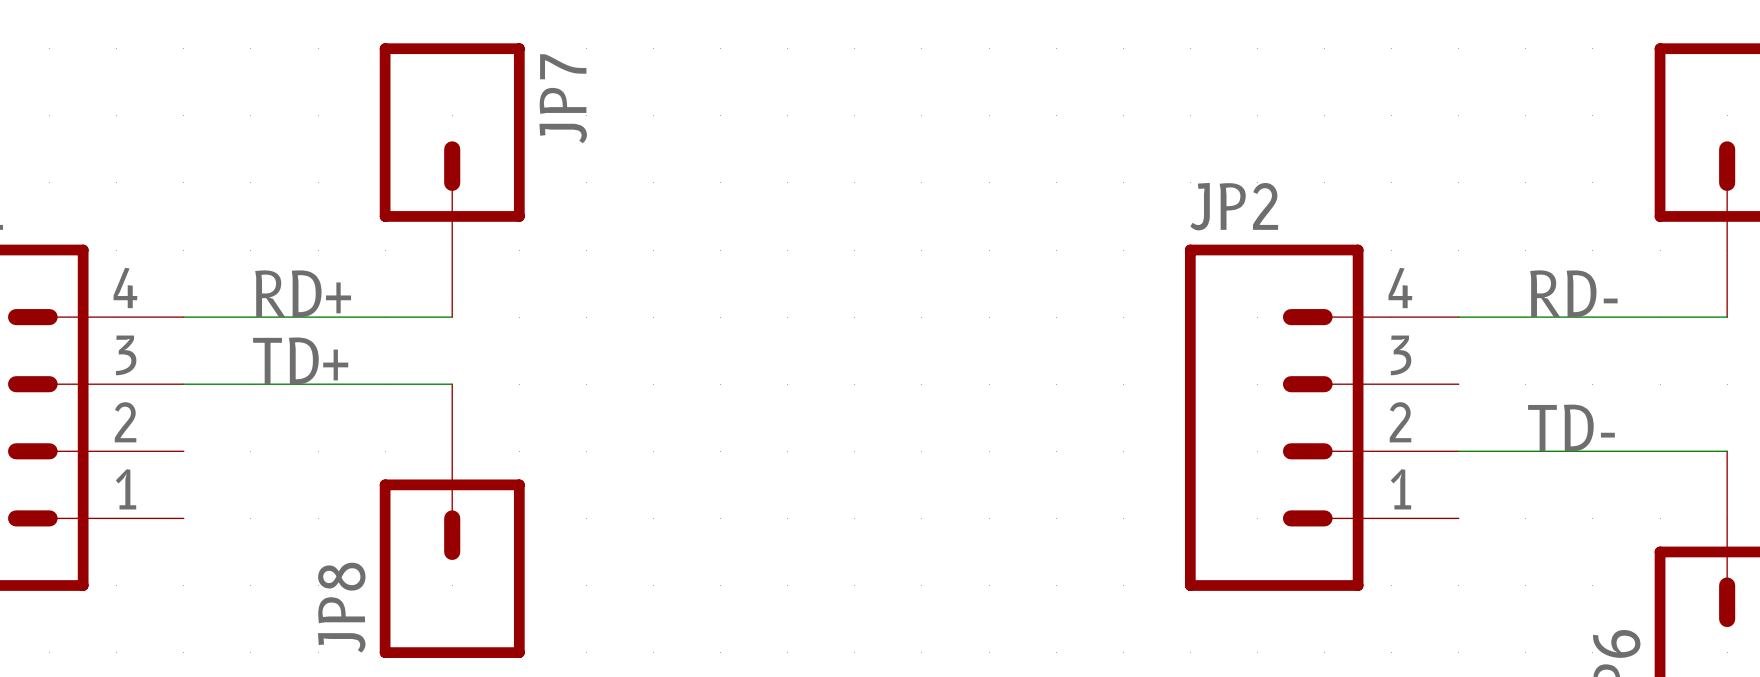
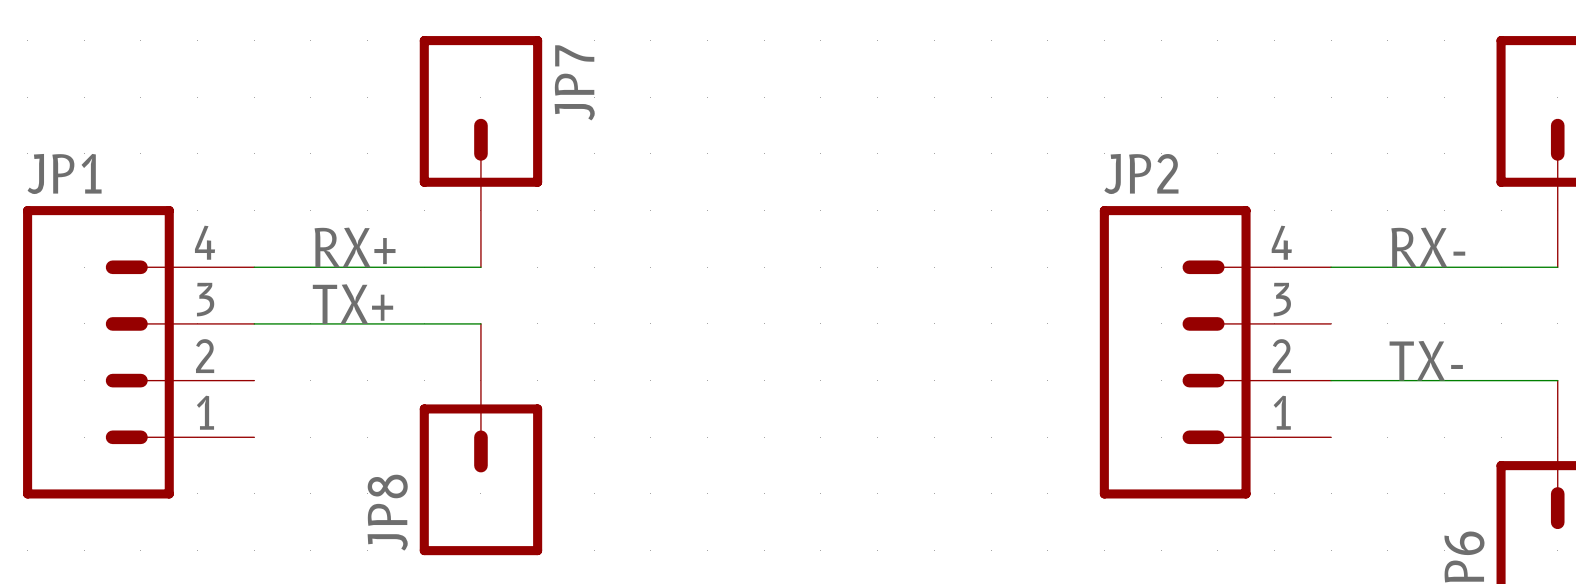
label: RD+ (303, 293) -> RX+ (355, 247)
label: RD- (1573, 293) -> RX- (1428, 247)
label: TD+ (300, 360) -> TX+ (352, 304)
label: TD- (1571, 427) -> TX- (1426, 360)

